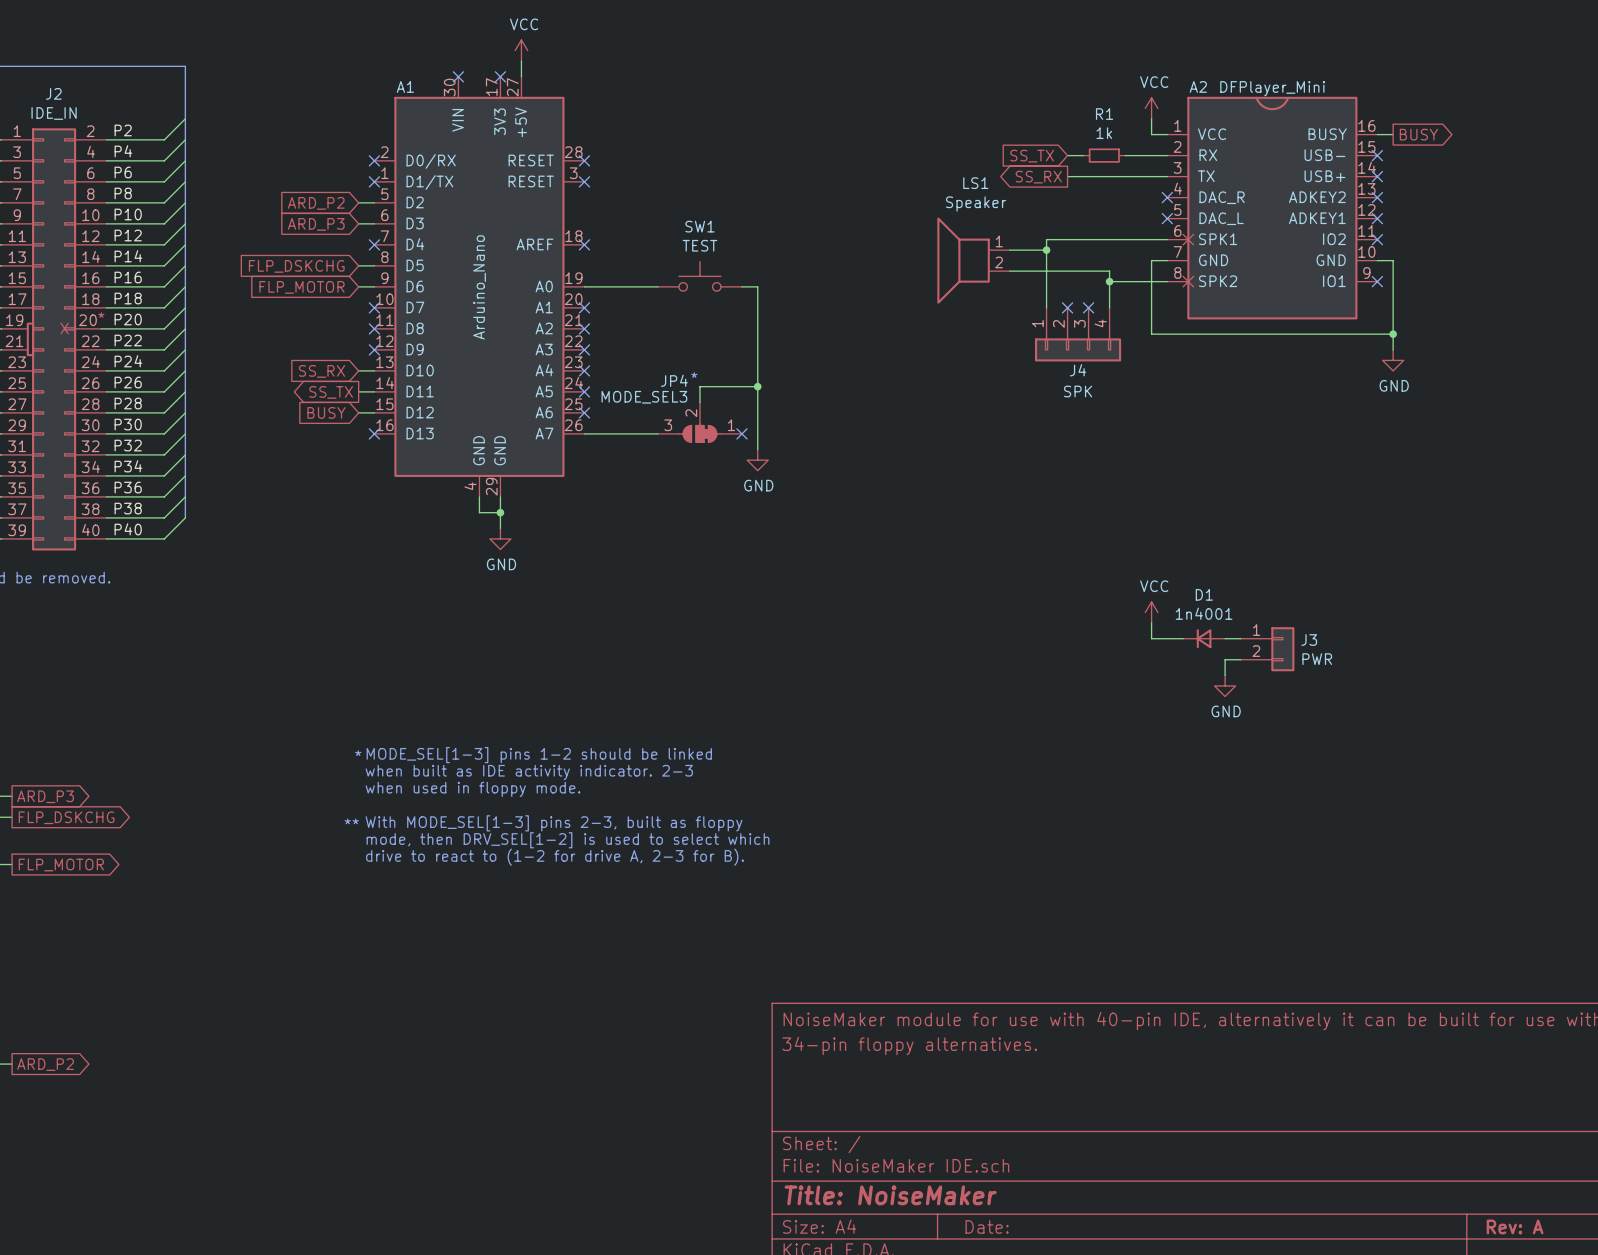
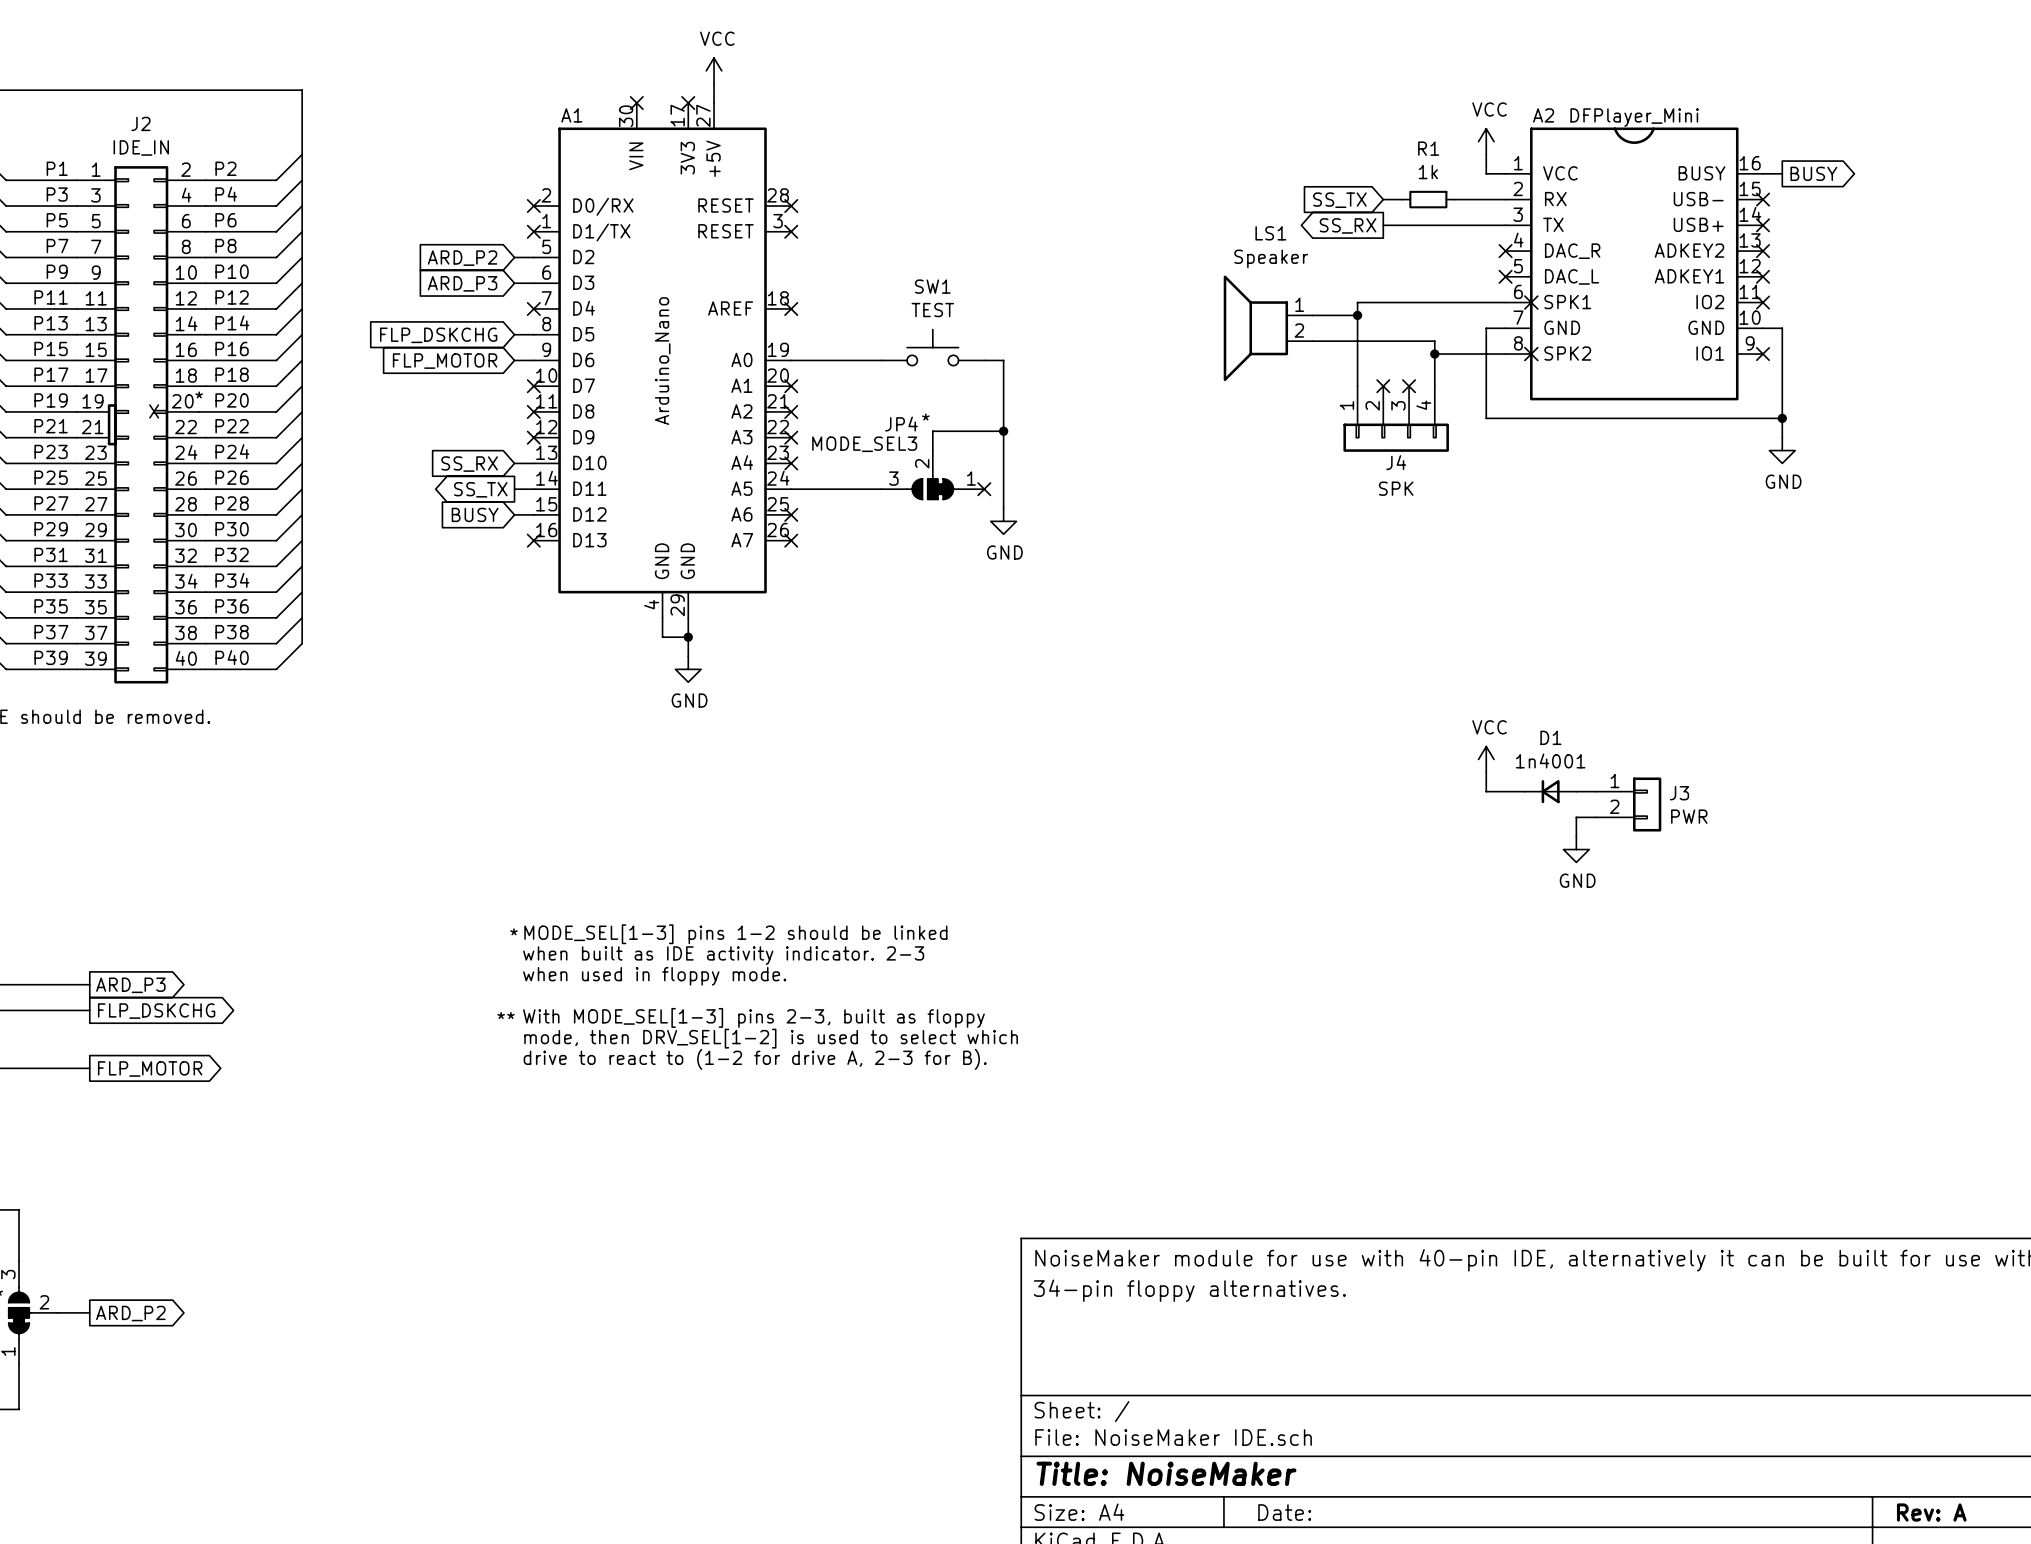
text position: * (694, 375) -> * (925, 417)
wire: (757, 386) (699, 386) (699, 402) -> (1003, 431) (932, 431) (932, 450)
junction position: (757, 386) -> (1003, 431)
no-connect mark position: (584, 391) -> (791, 540)
wire: (757, 407) (757, 449) -> none
JP4 position: (699, 422) -> (932, 475)
wire: (584, 433) (657, 433) -> (791, 489) (881, 489)
no-connect mark position: (741, 433) -> (984, 489)
power symbol position: GND (757, 460) -> GND (1003, 521)

